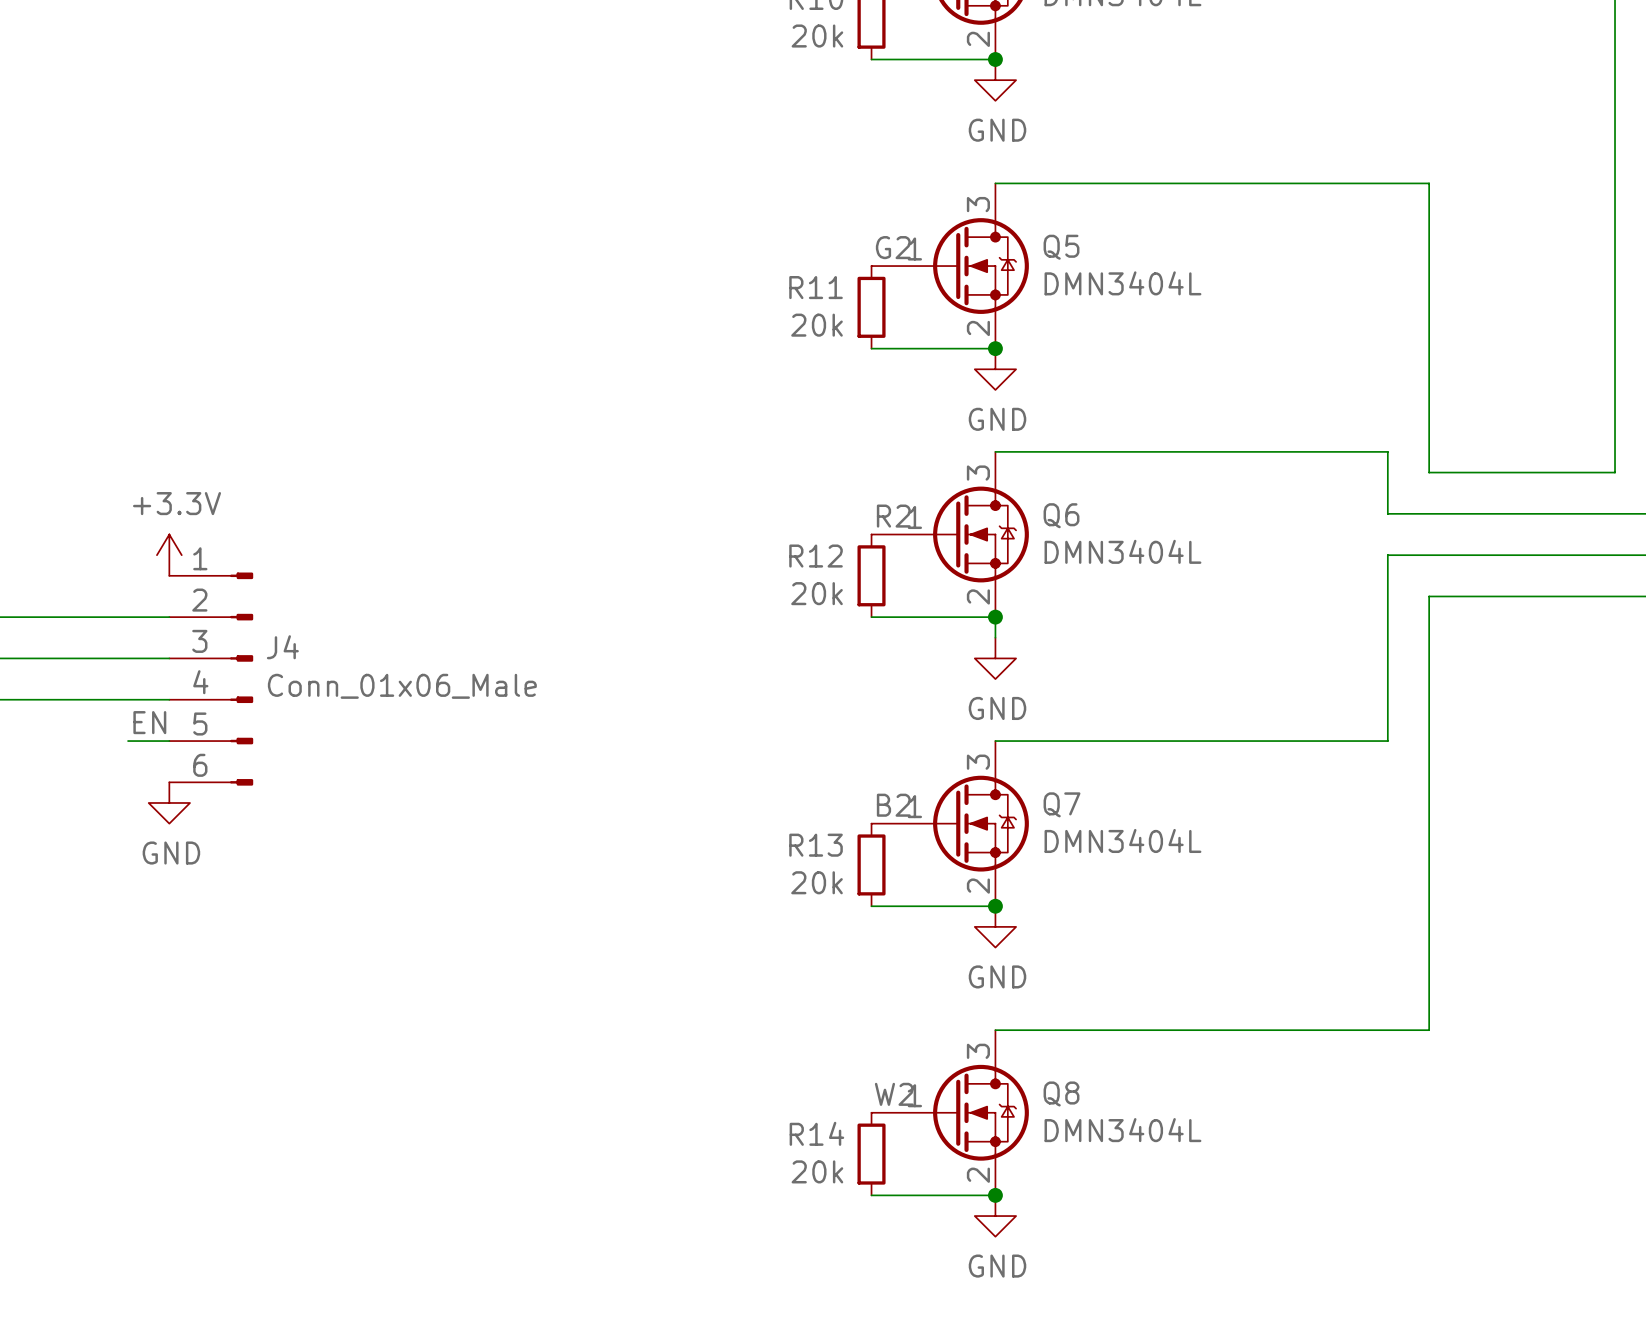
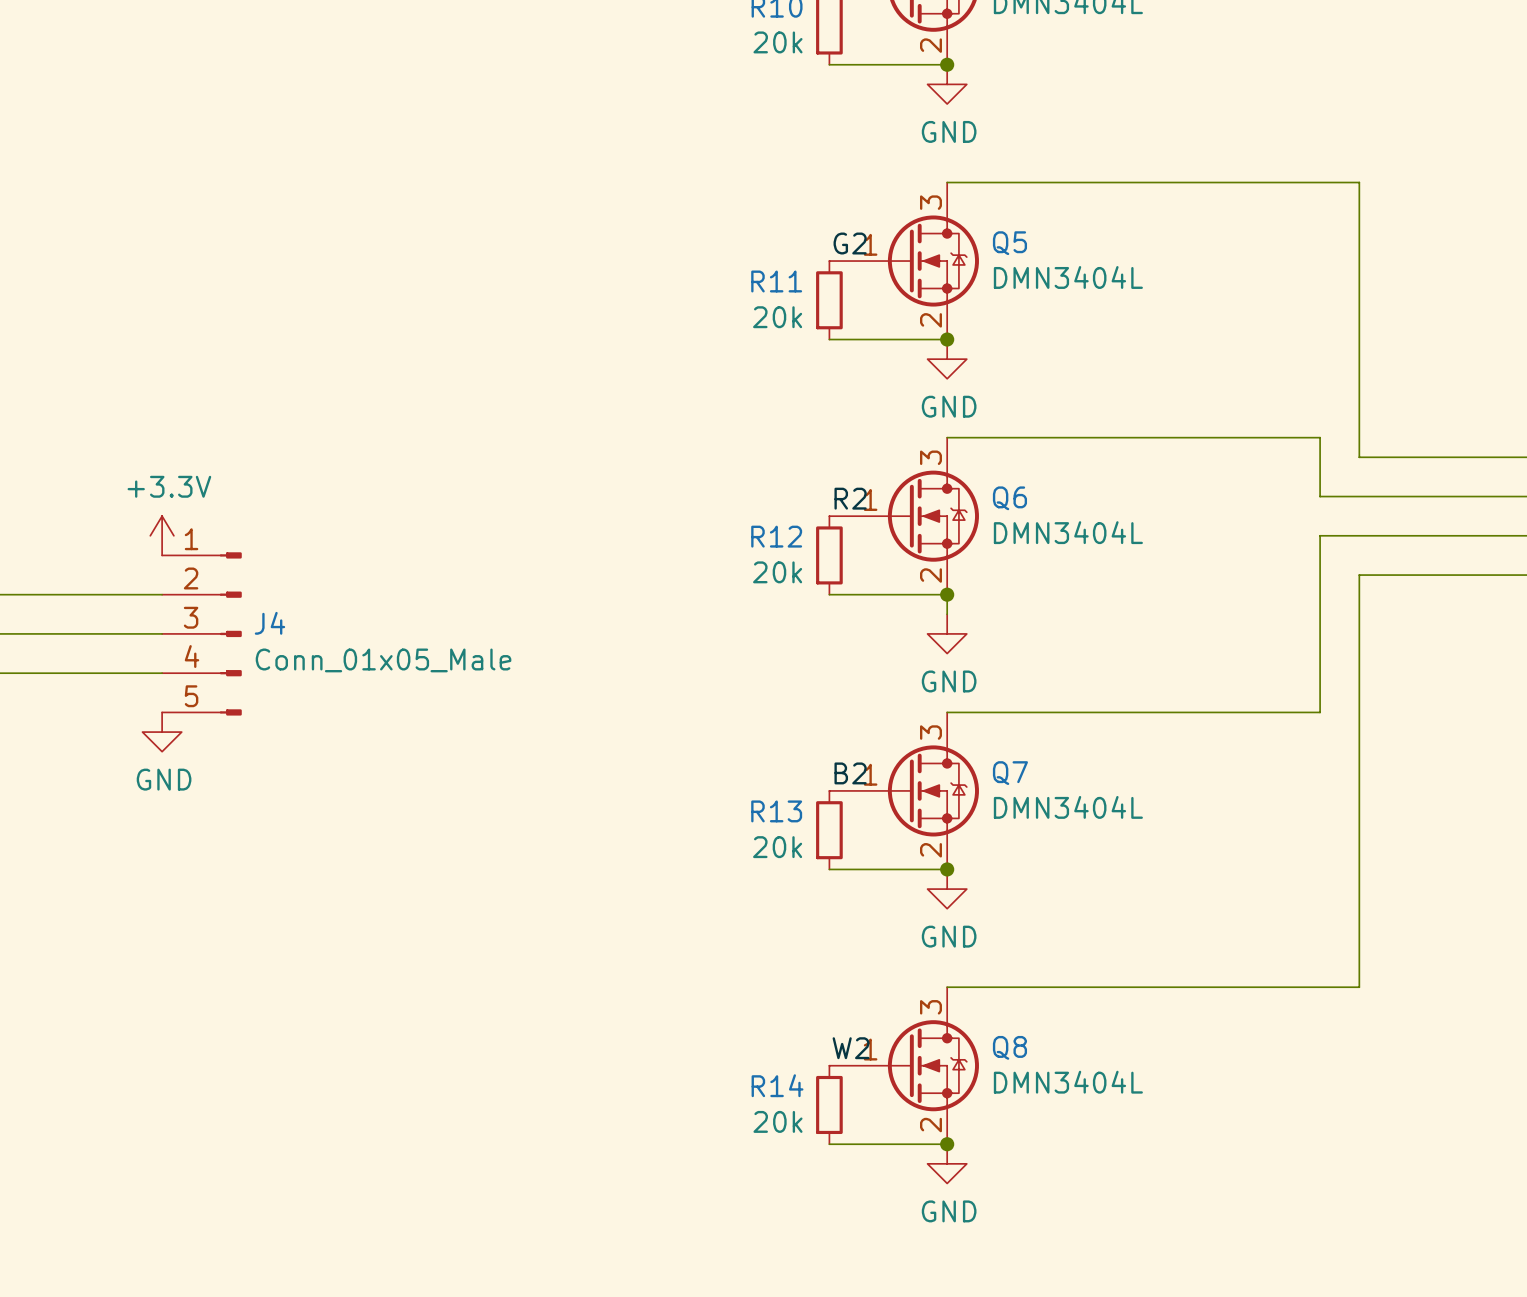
J4 symbol: [169, 572, 254, 786] -> [162, 552, 242, 716]
J4 value: Conn_01x06_Male (402, 686) -> Conn_01x05_Male (383, 660)
label: EN (149, 722) -> none
wire: (128, 741) (169, 741) -> none
power symbol position: GND (169, 802) -> GND (162, 732)

